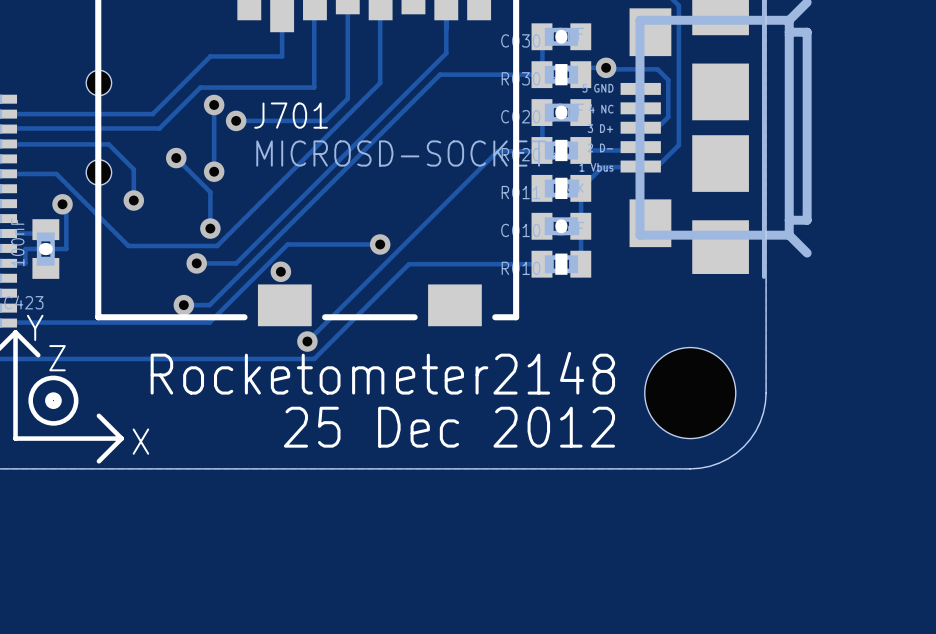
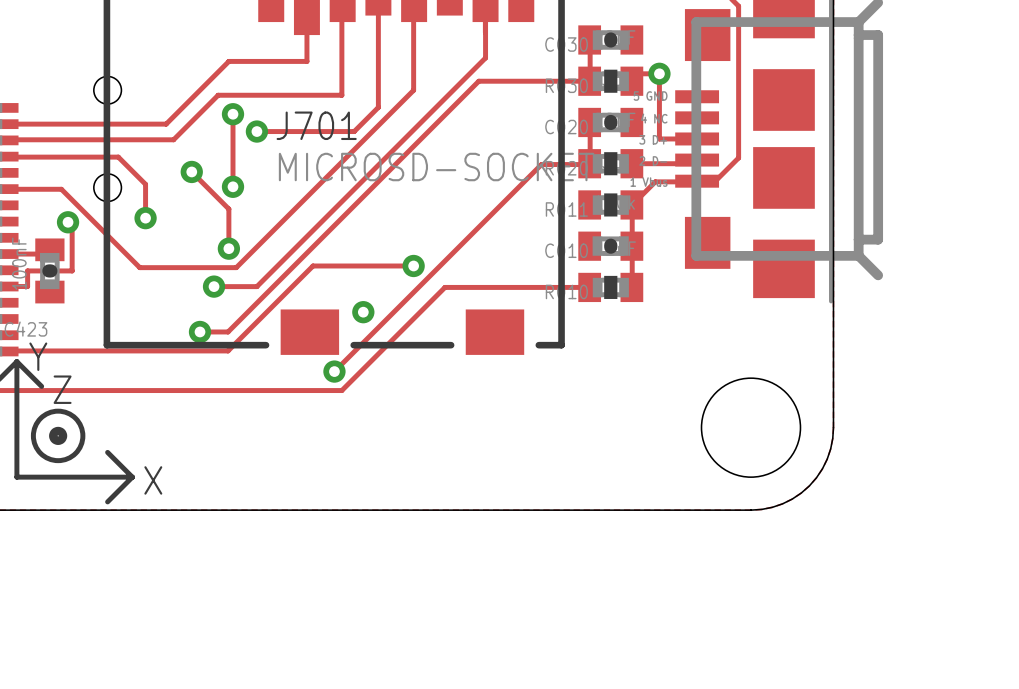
track: (607, 69) (657, 69) (668, 79) (668, 117) (657, 127) (640, 127) -> (659, 73) (659, 138) (697, 138)
via position: (280, 271) -> (363, 312)
text: Rocketometer2148 (382, 373) -> none
text: 25 Dec 2012 (449, 427) -> none

